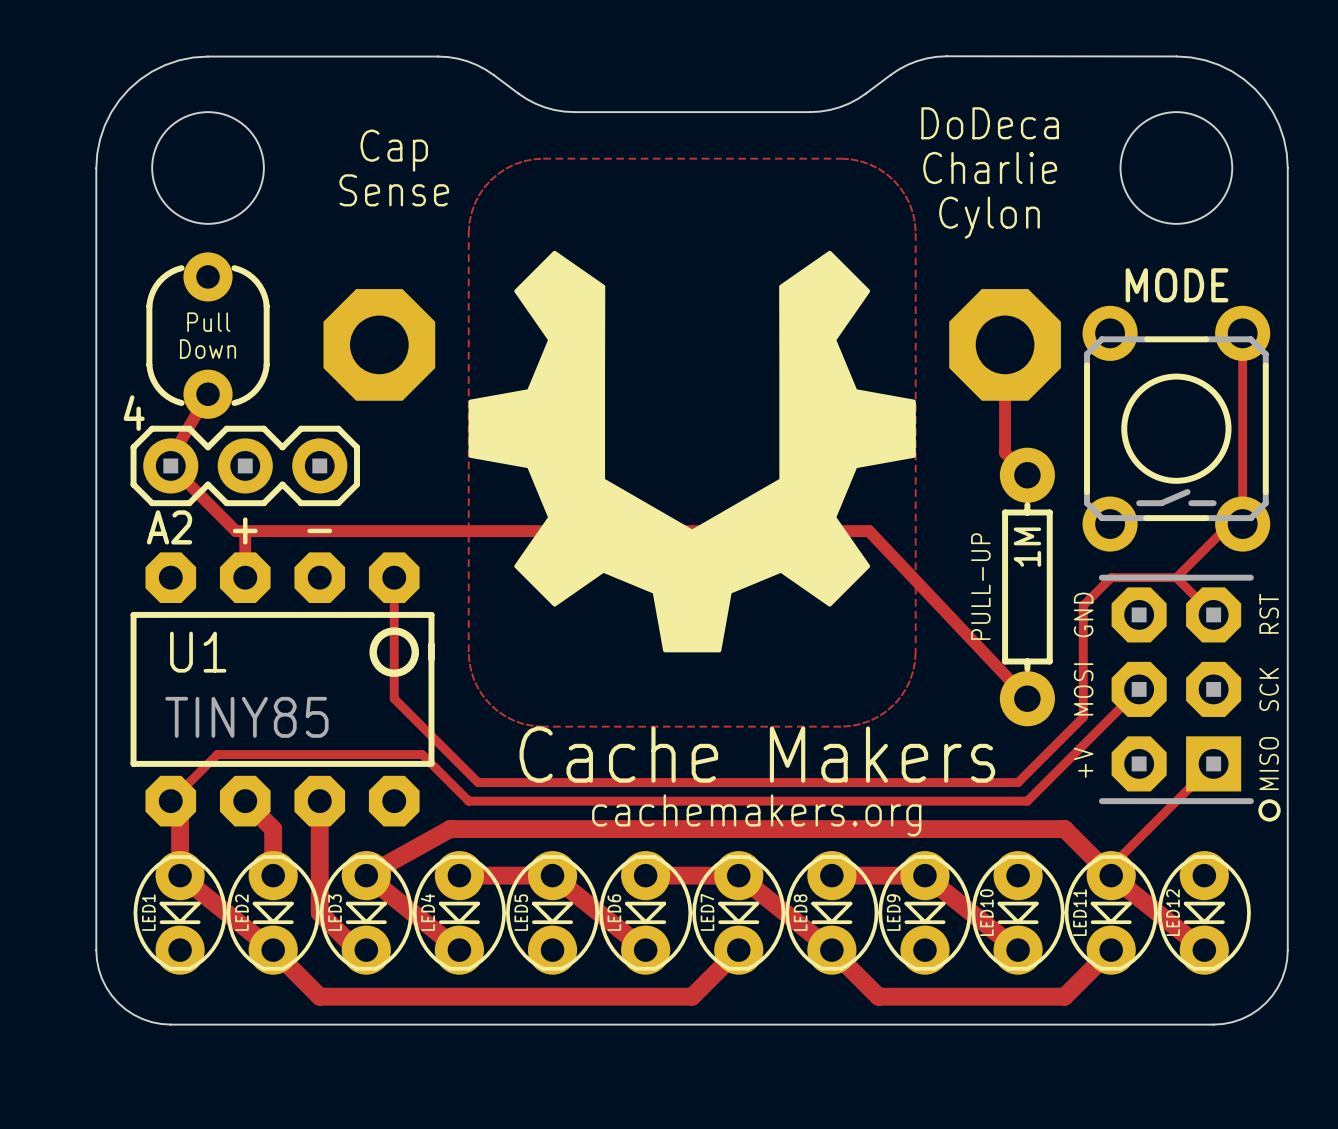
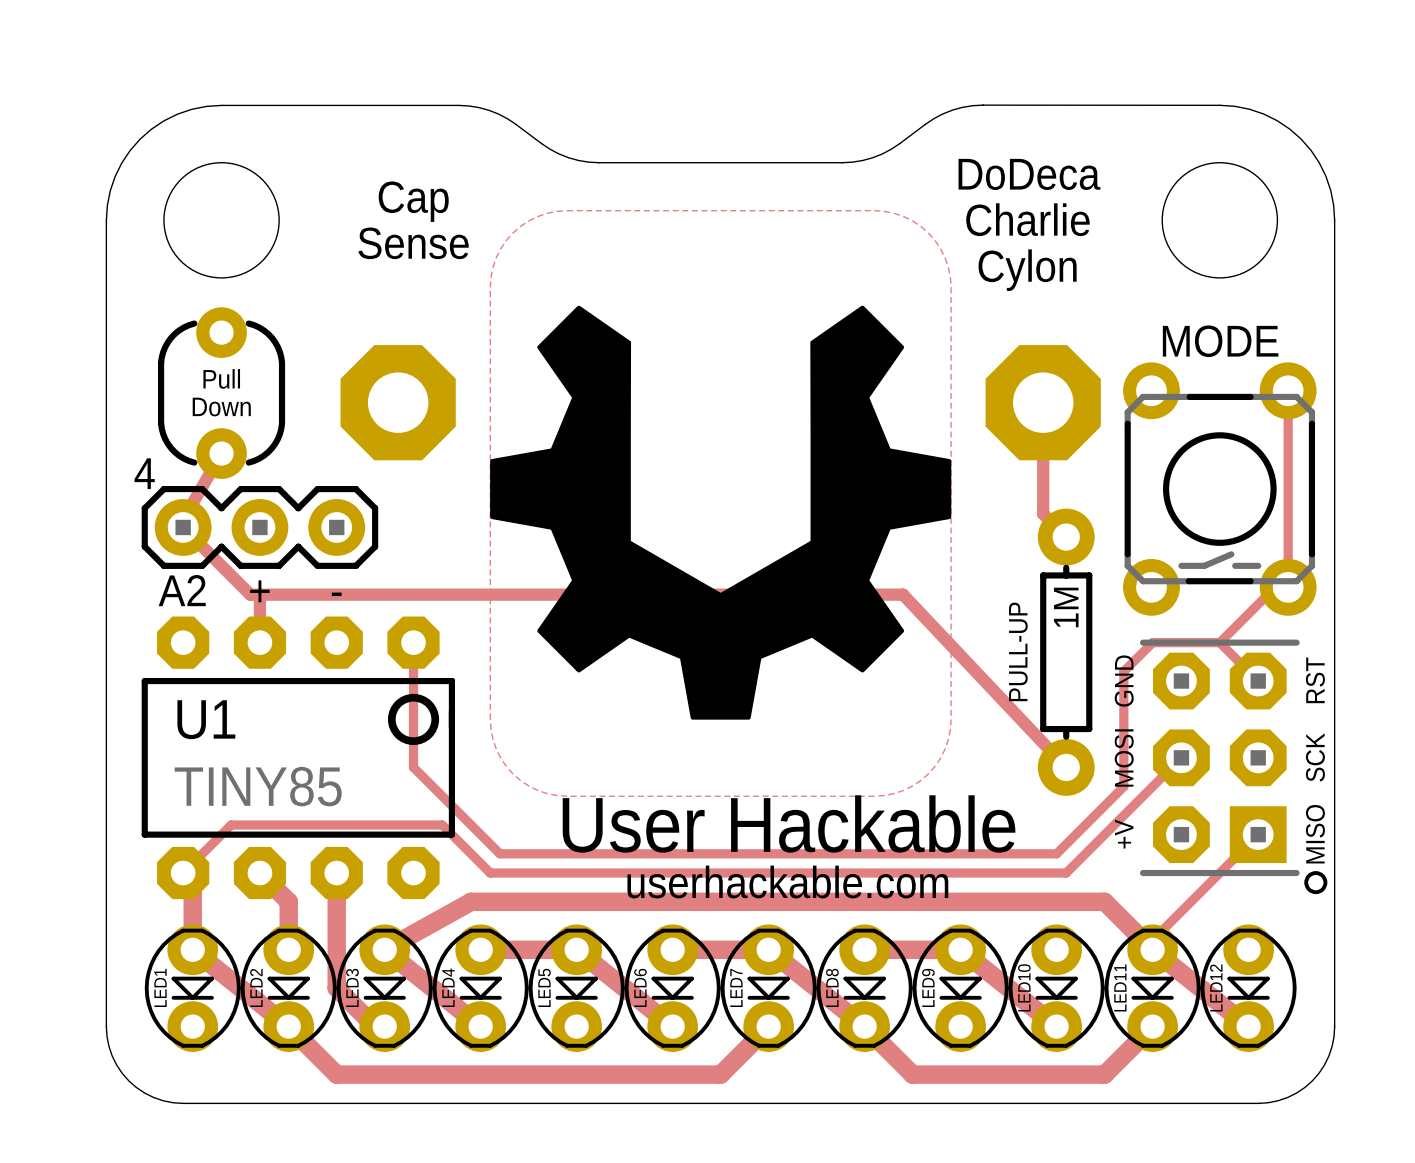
text: Cache Makers (757, 754) -> User Hackable (789, 823)
text: cachemakers.org (756, 815) -> userhackable.com (787, 882)

